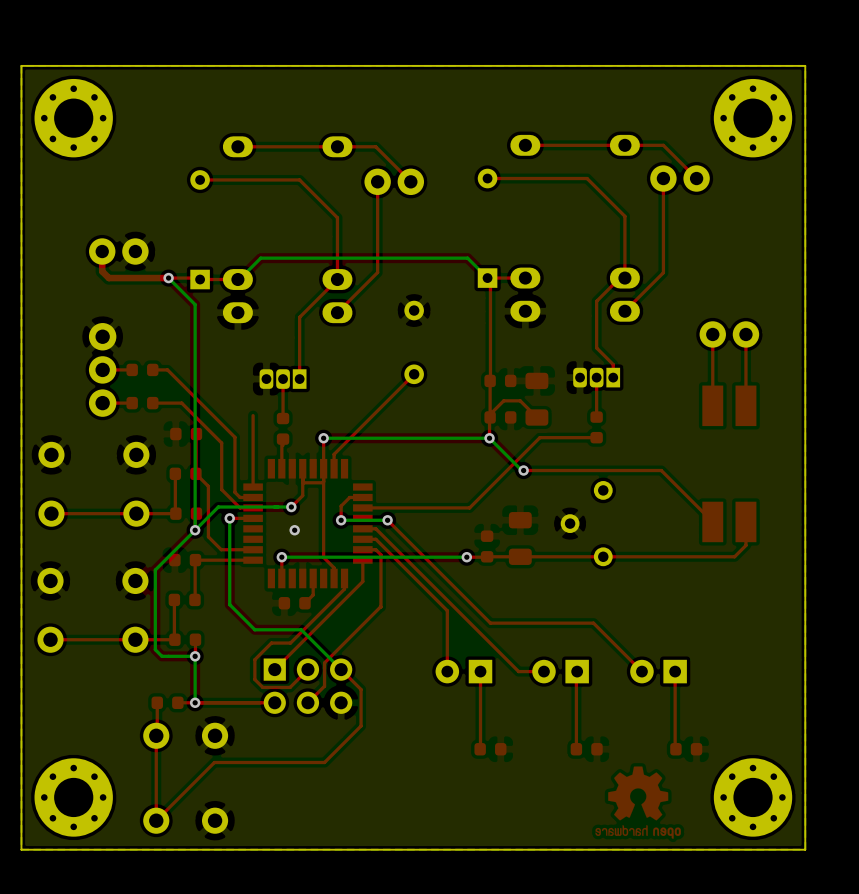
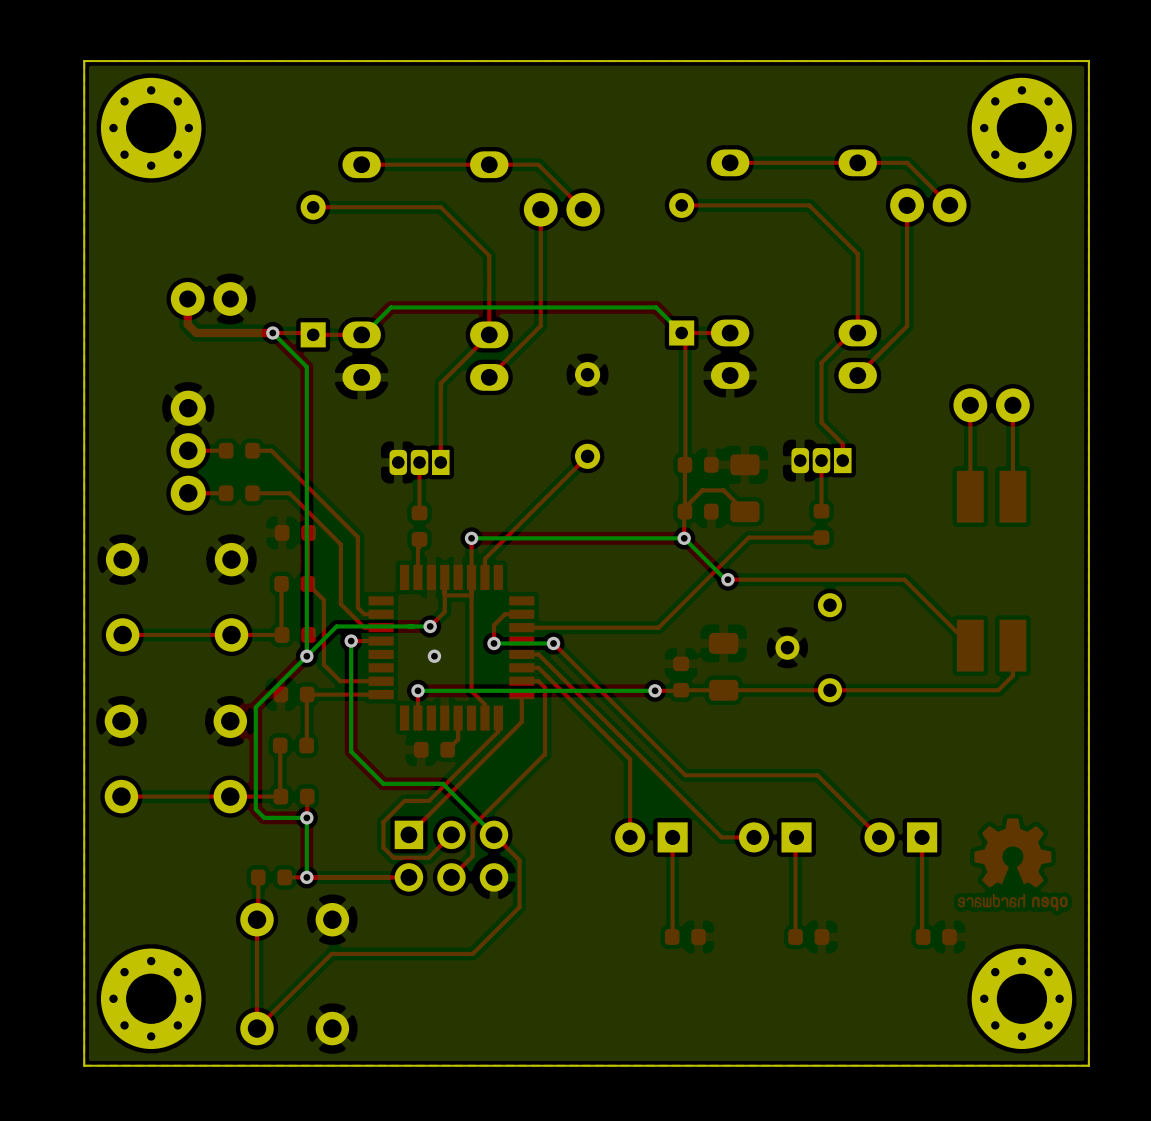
top track: (253, 415) (253, 487) -> none
drawing position: (638, 802) -> (1012, 864)

